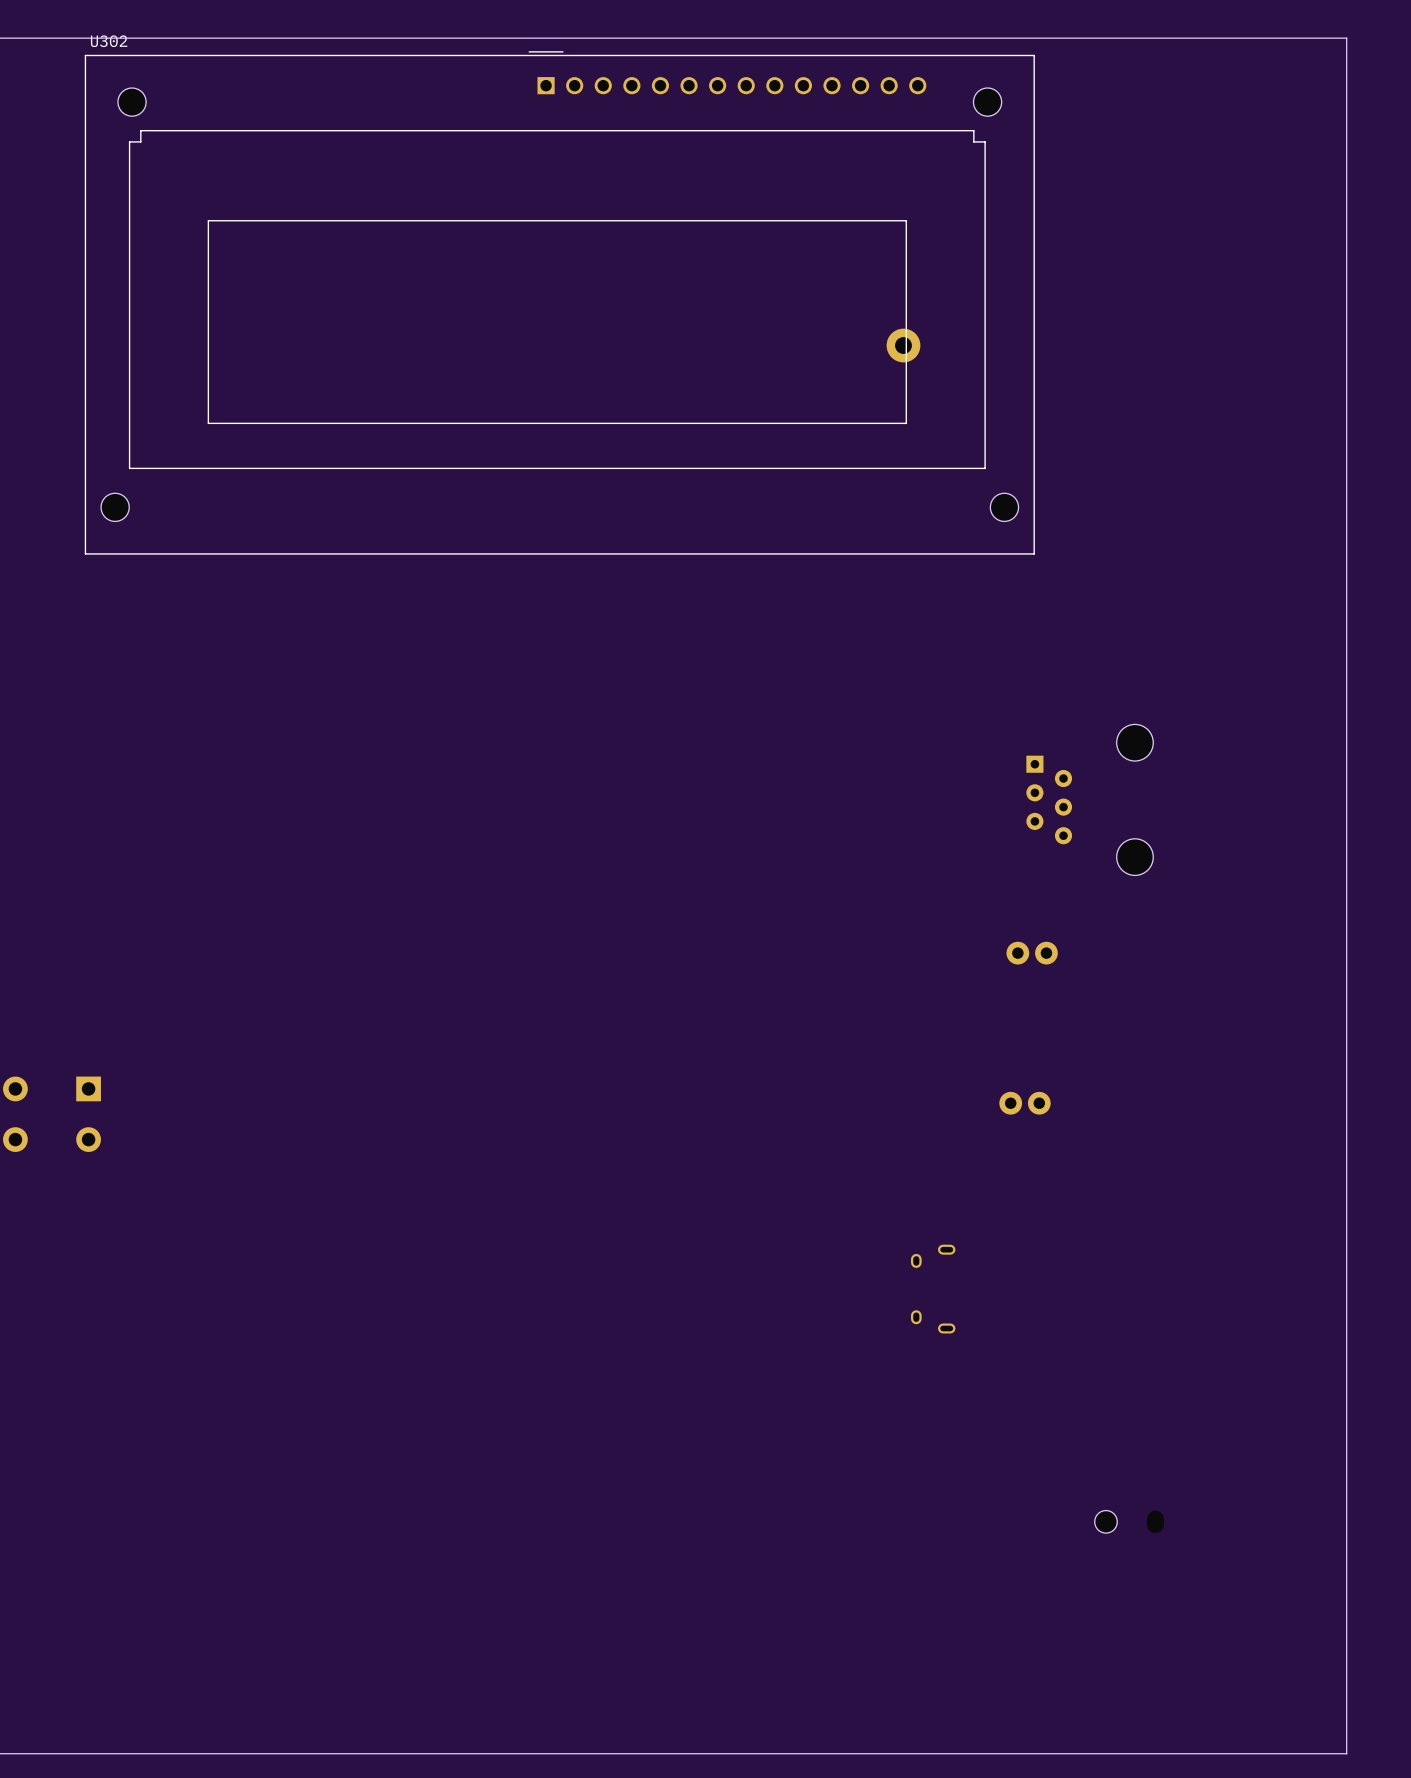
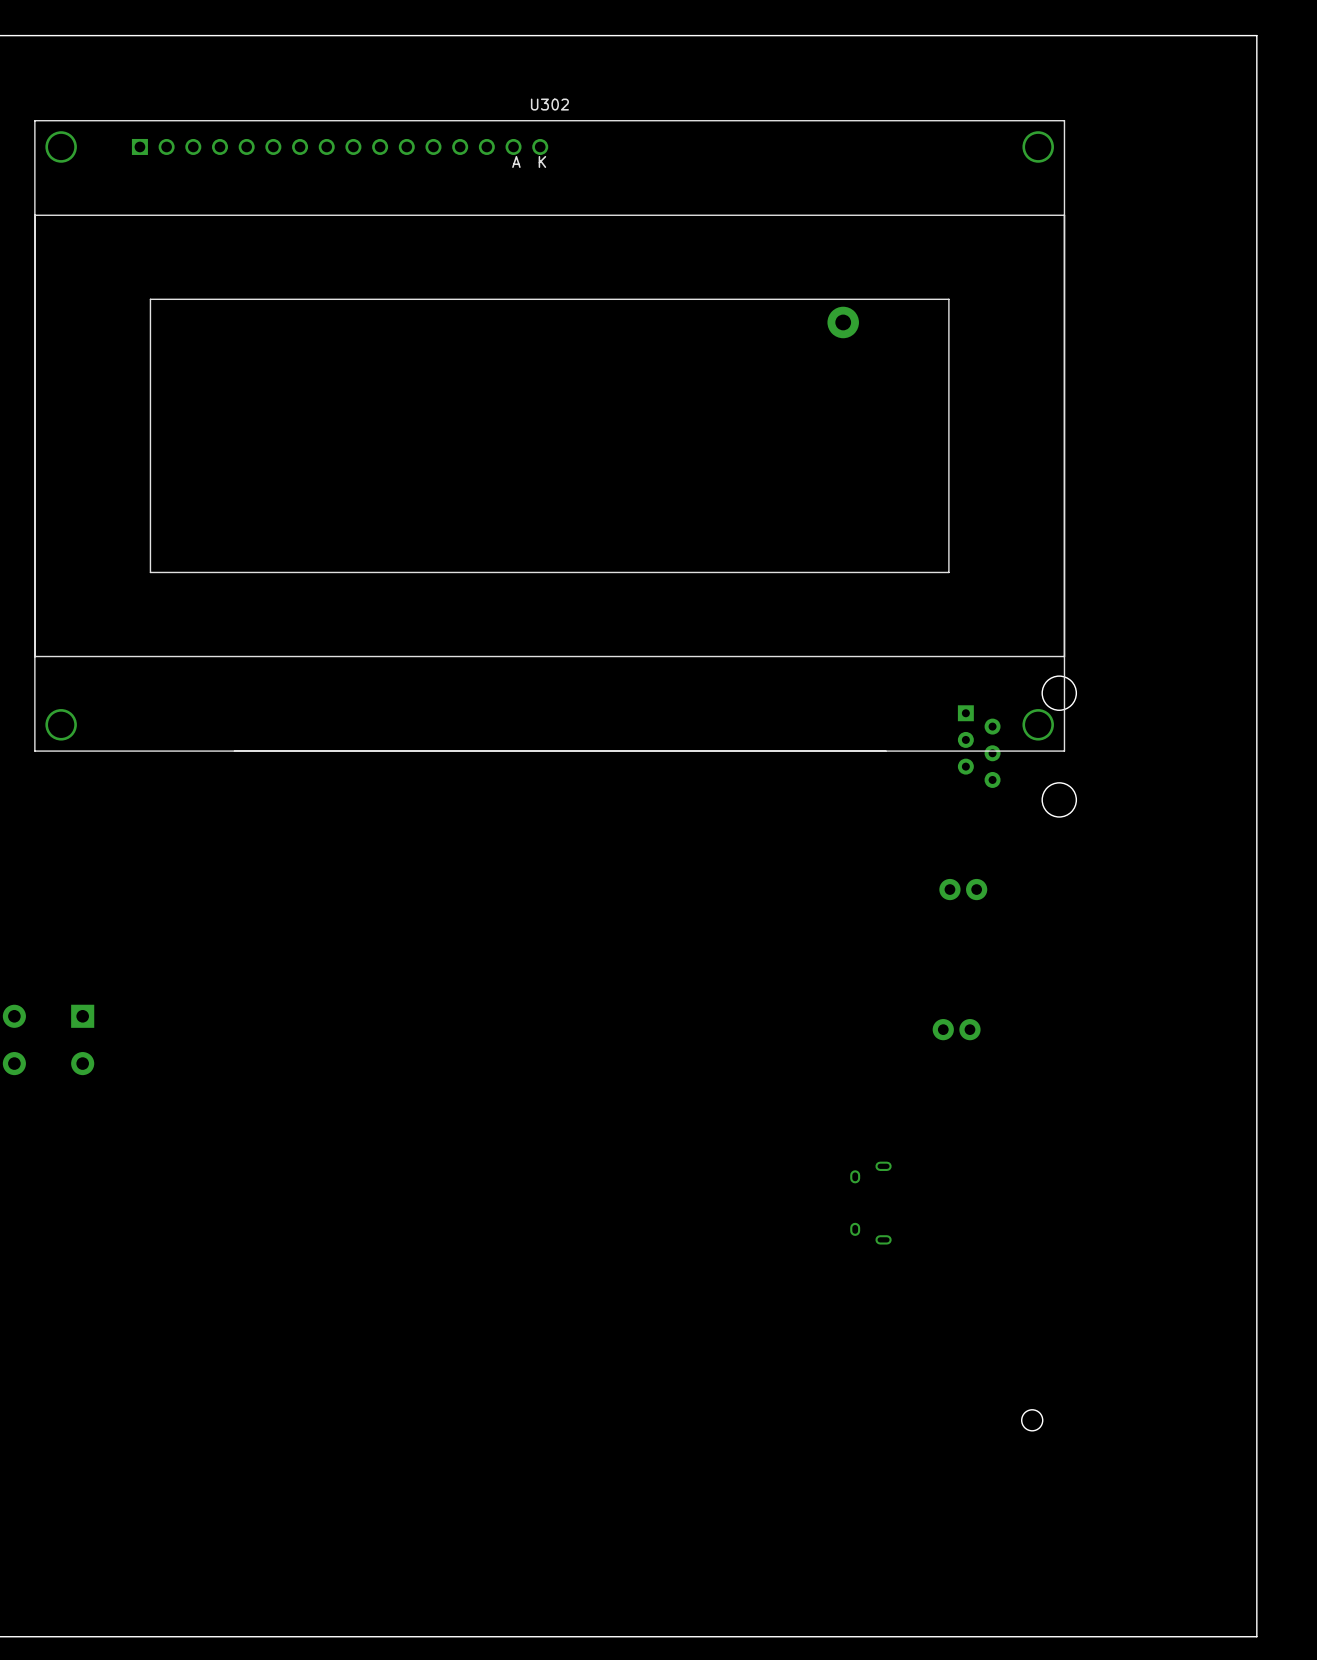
U302 name position: U302 (109, 41) -> U302 (549, 104)
U302 footprint: [84, 51, 1035, 555] -> [34, 120, 1066, 752]

